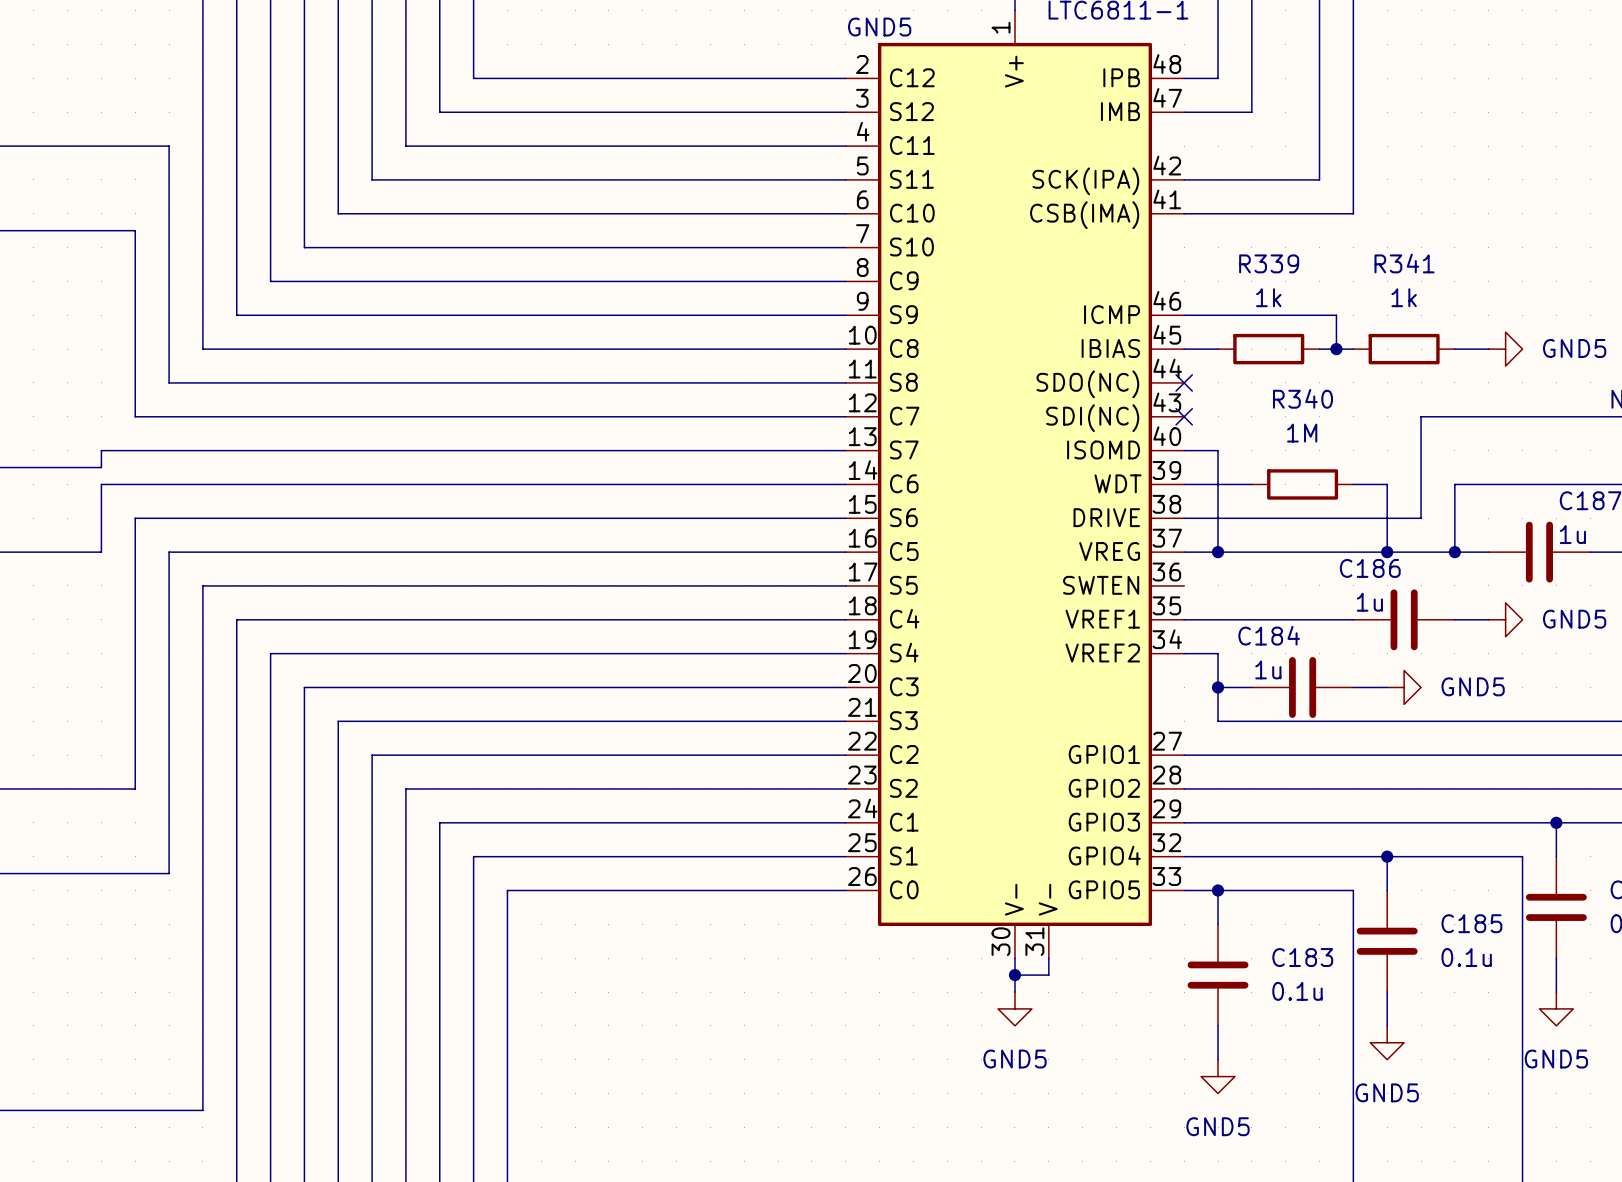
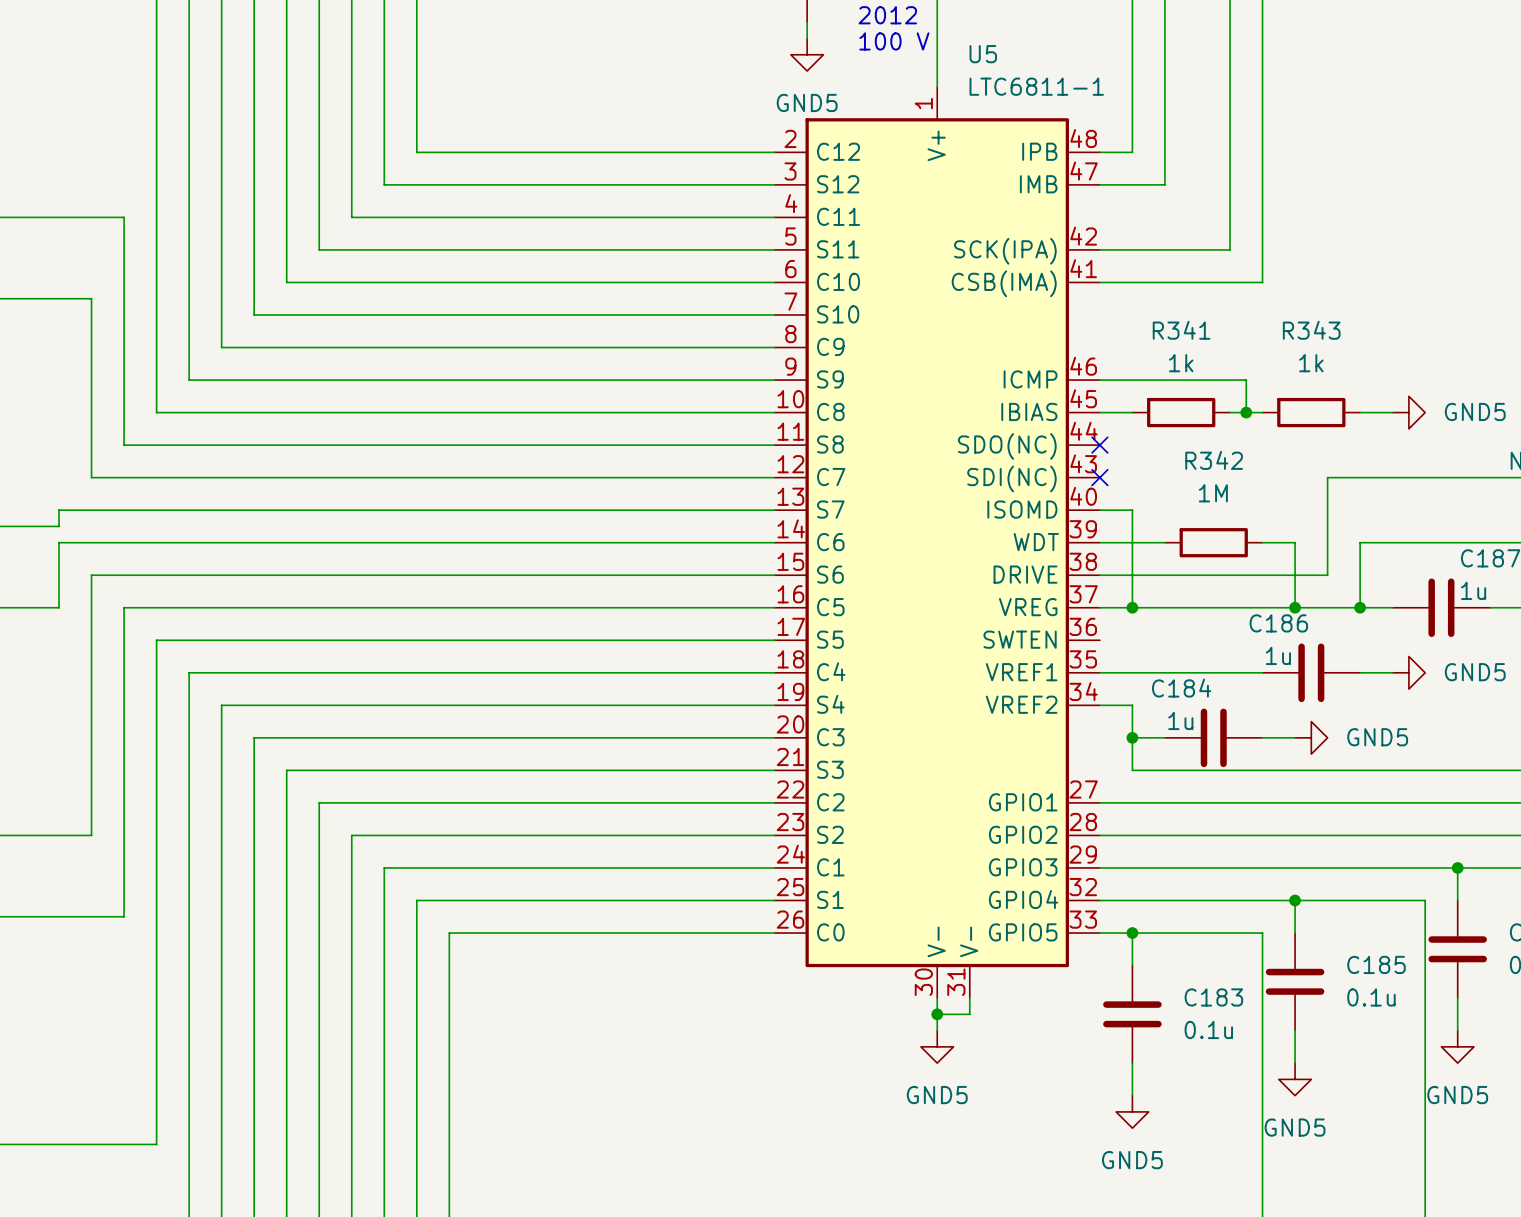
R339 name: R339 (1269, 263) -> R341 (1181, 330)
R341 name: R341 (1404, 263) -> R343 (1311, 330)
R340 name: R340 (1303, 398) -> R342 (1214, 460)

